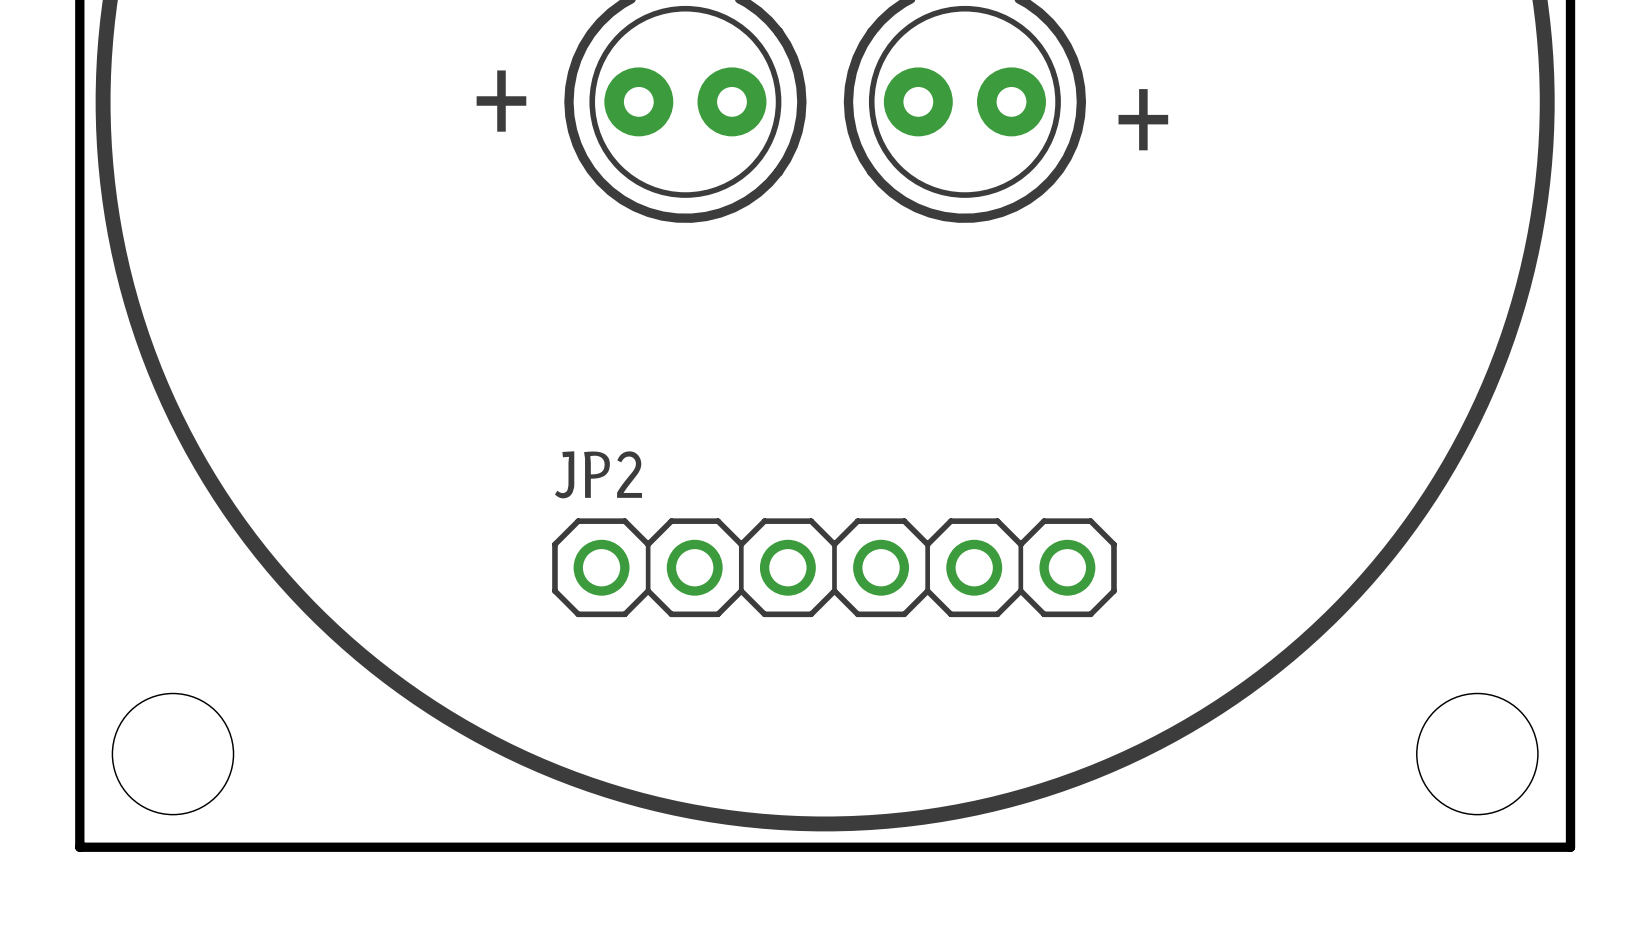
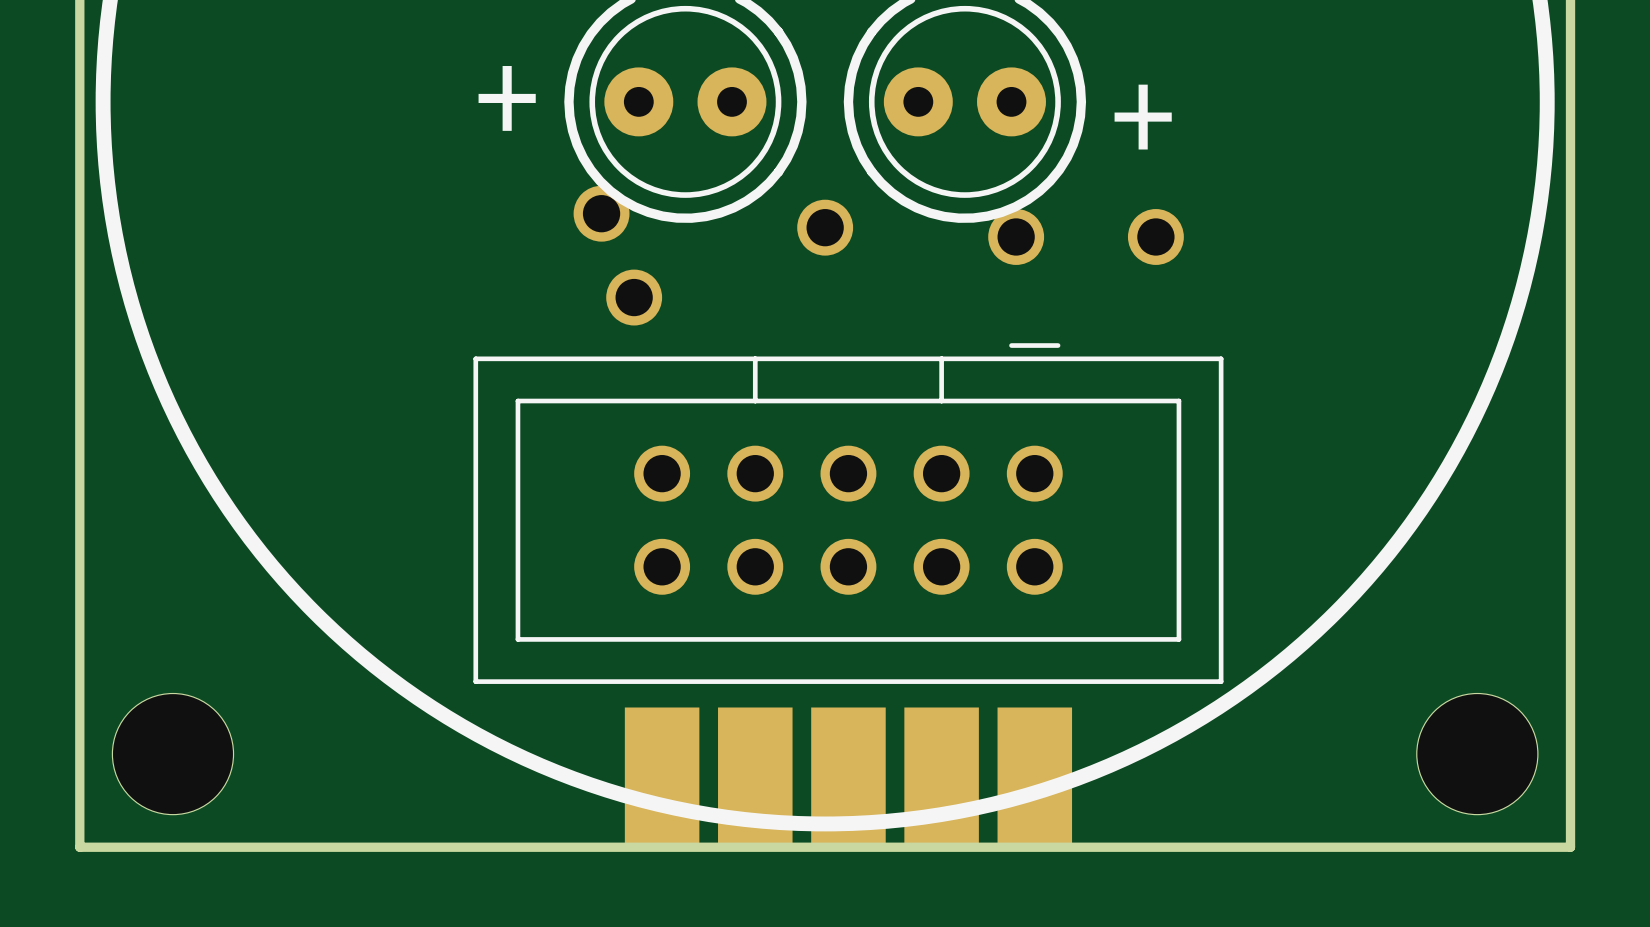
part: none -> (601, 213)
part: none -> (825, 227)
part: none -> (1016, 236)
part: none -> (1155, 236)
part: none -> (634, 297)
part: none -> (848, 513)
JP2: (834, 567) -> none
part: none -> (848, 777)

